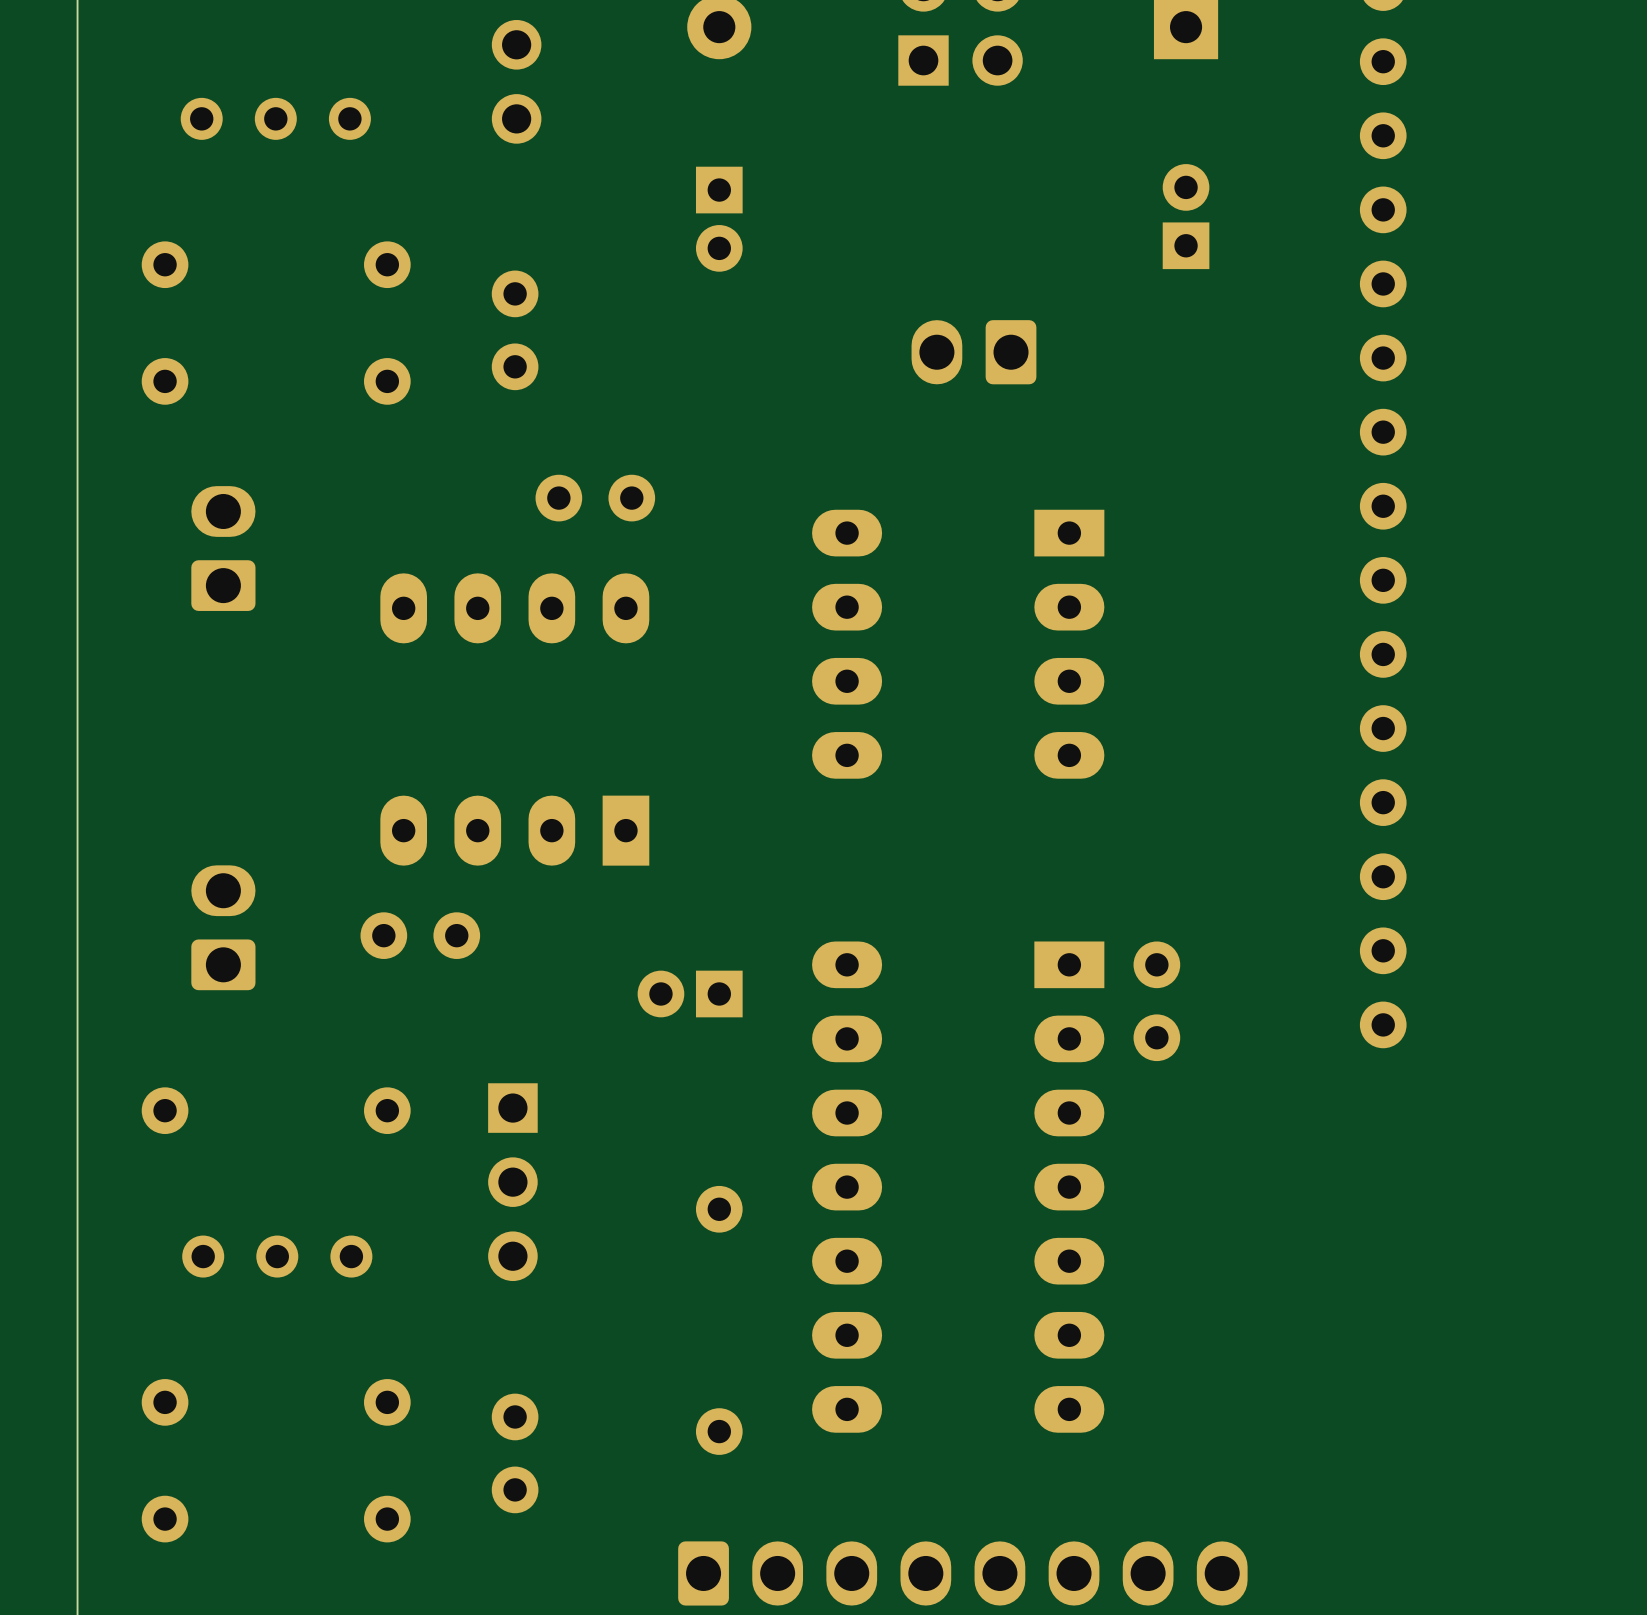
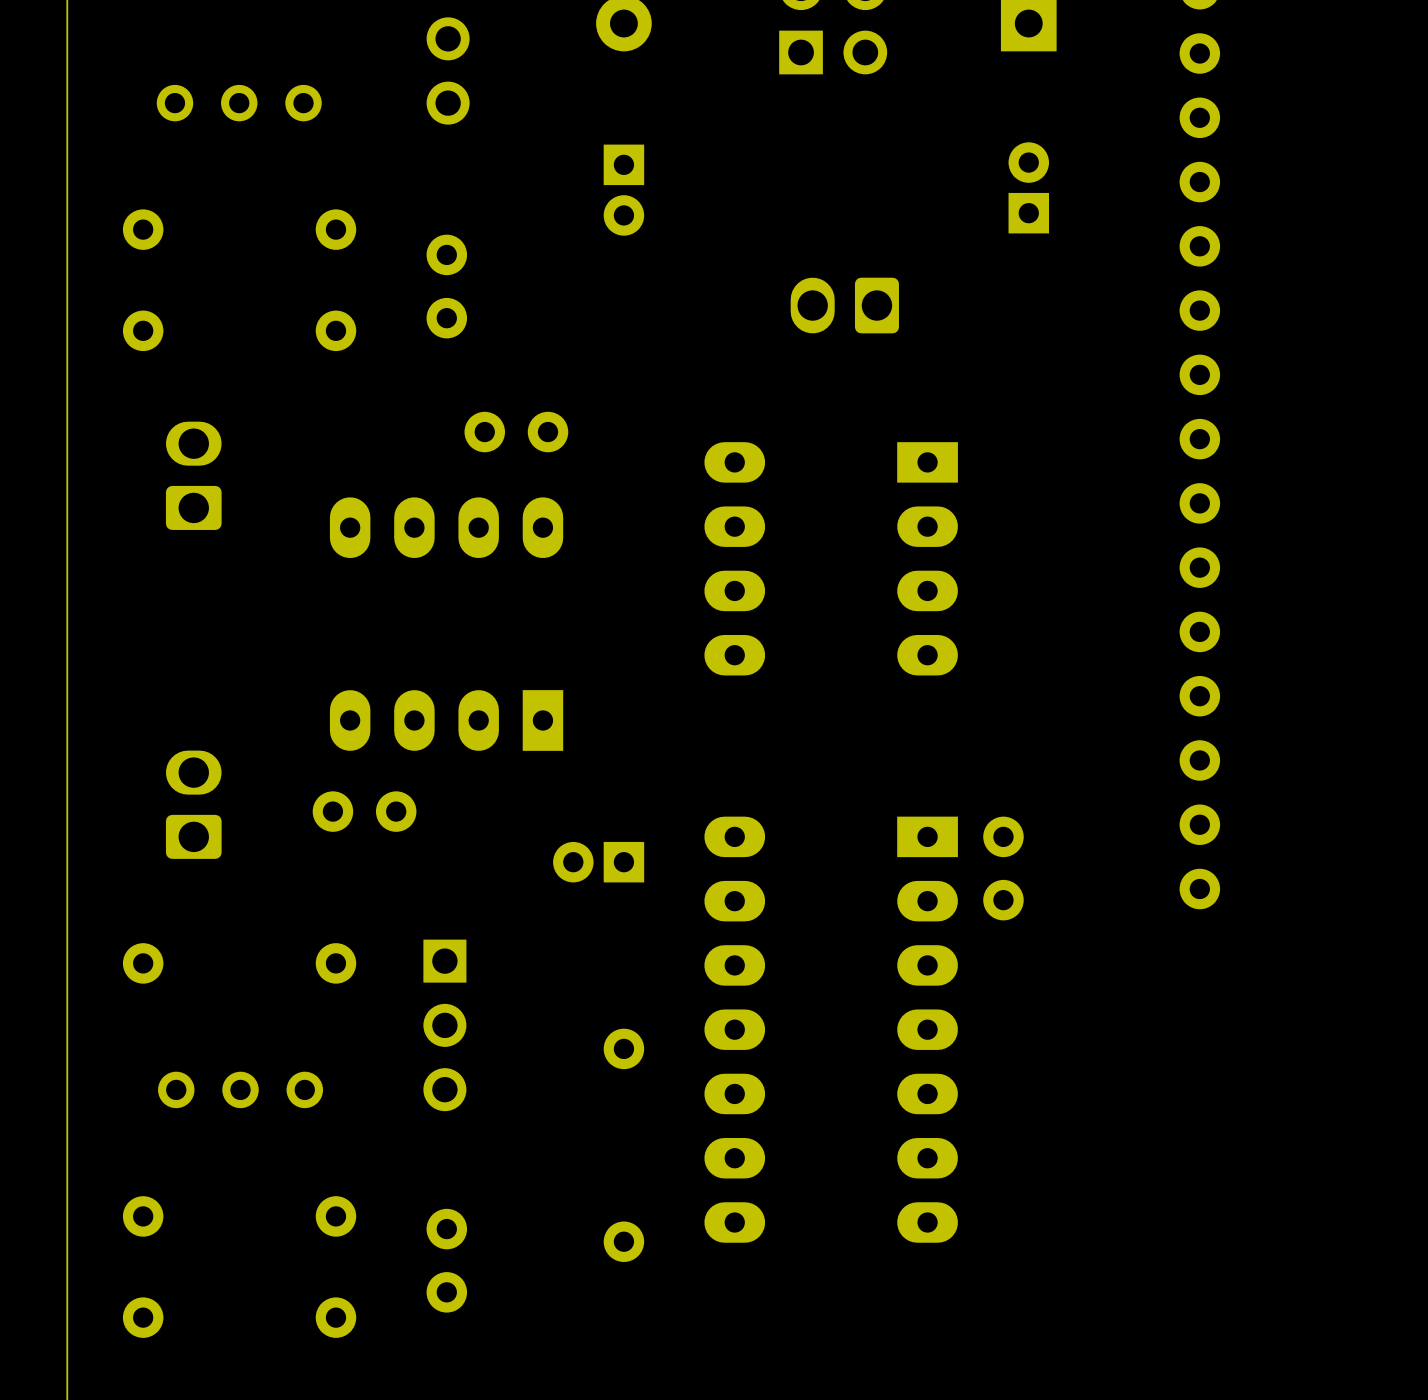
part: (962, 1573) -> none

